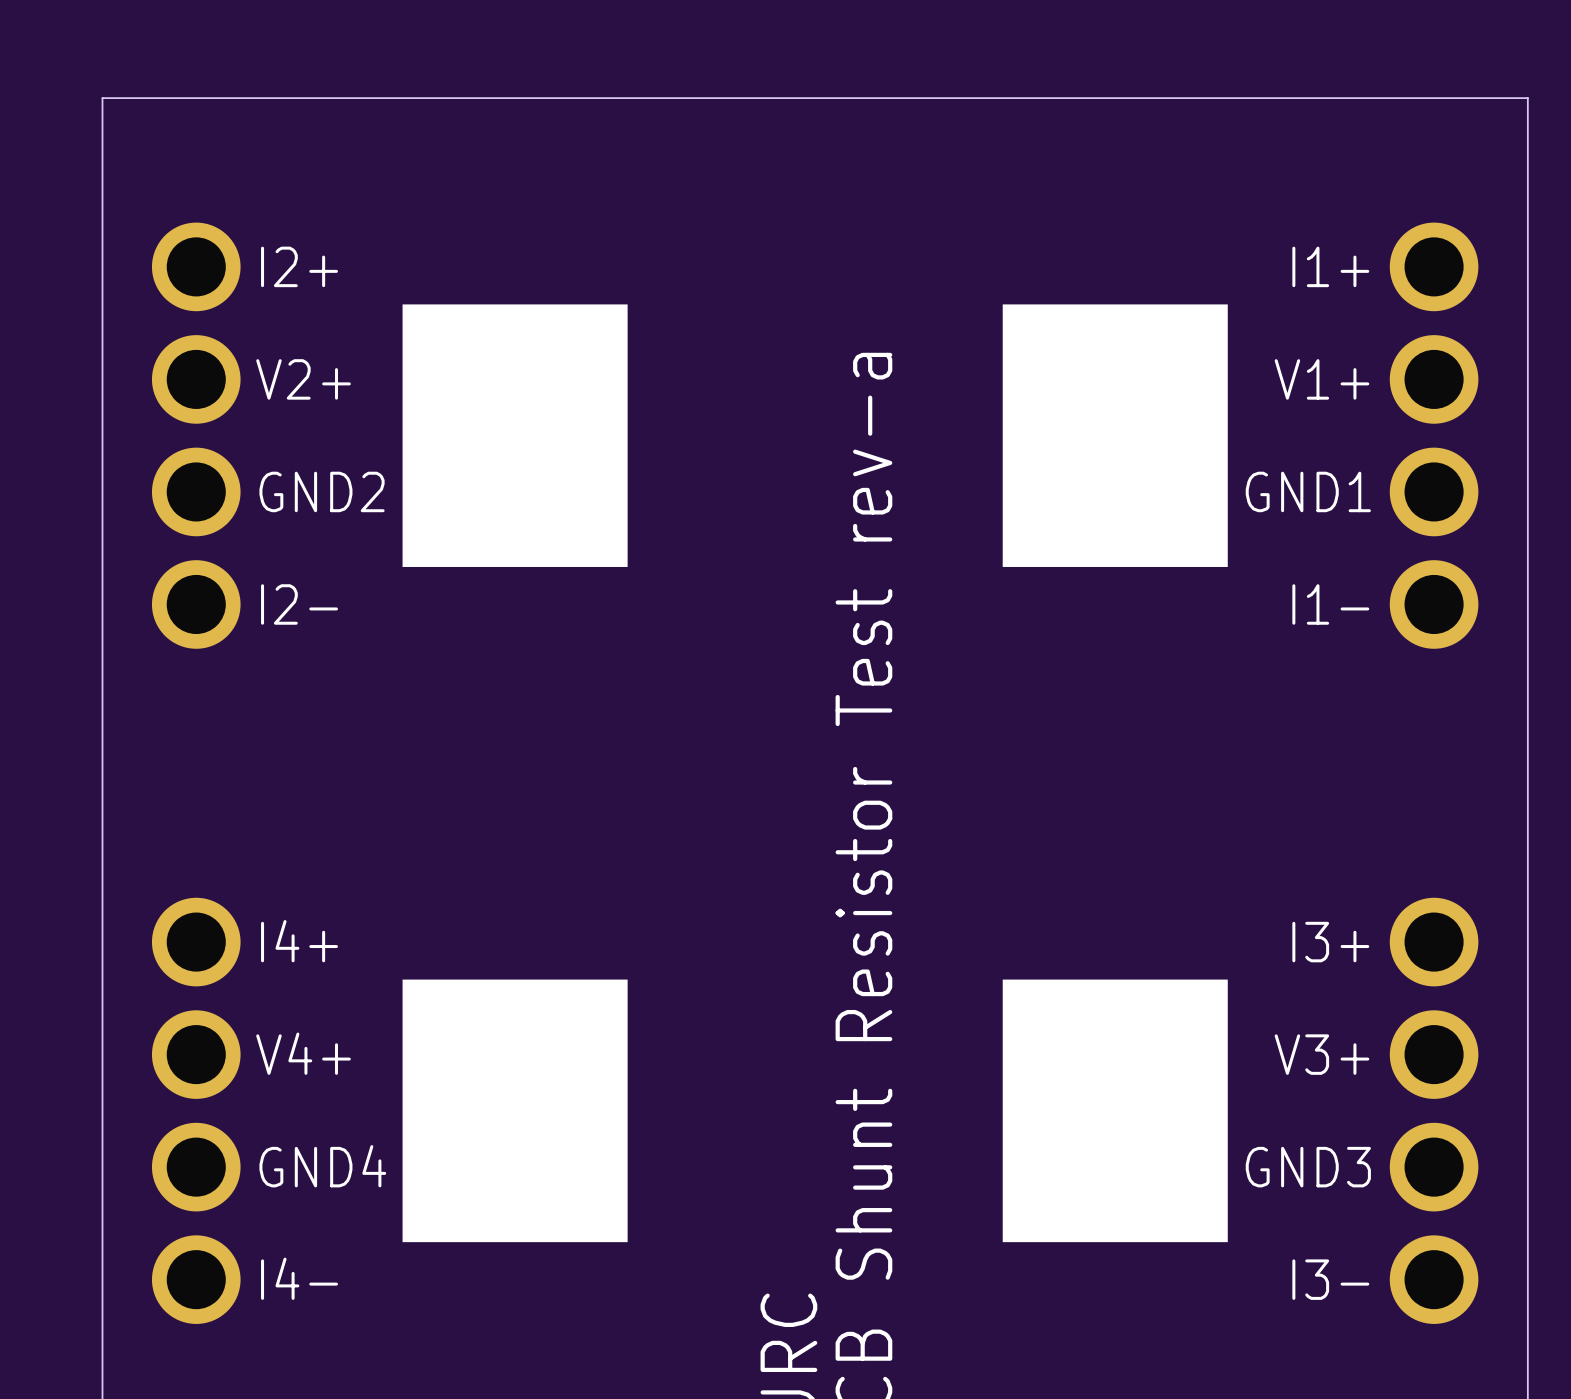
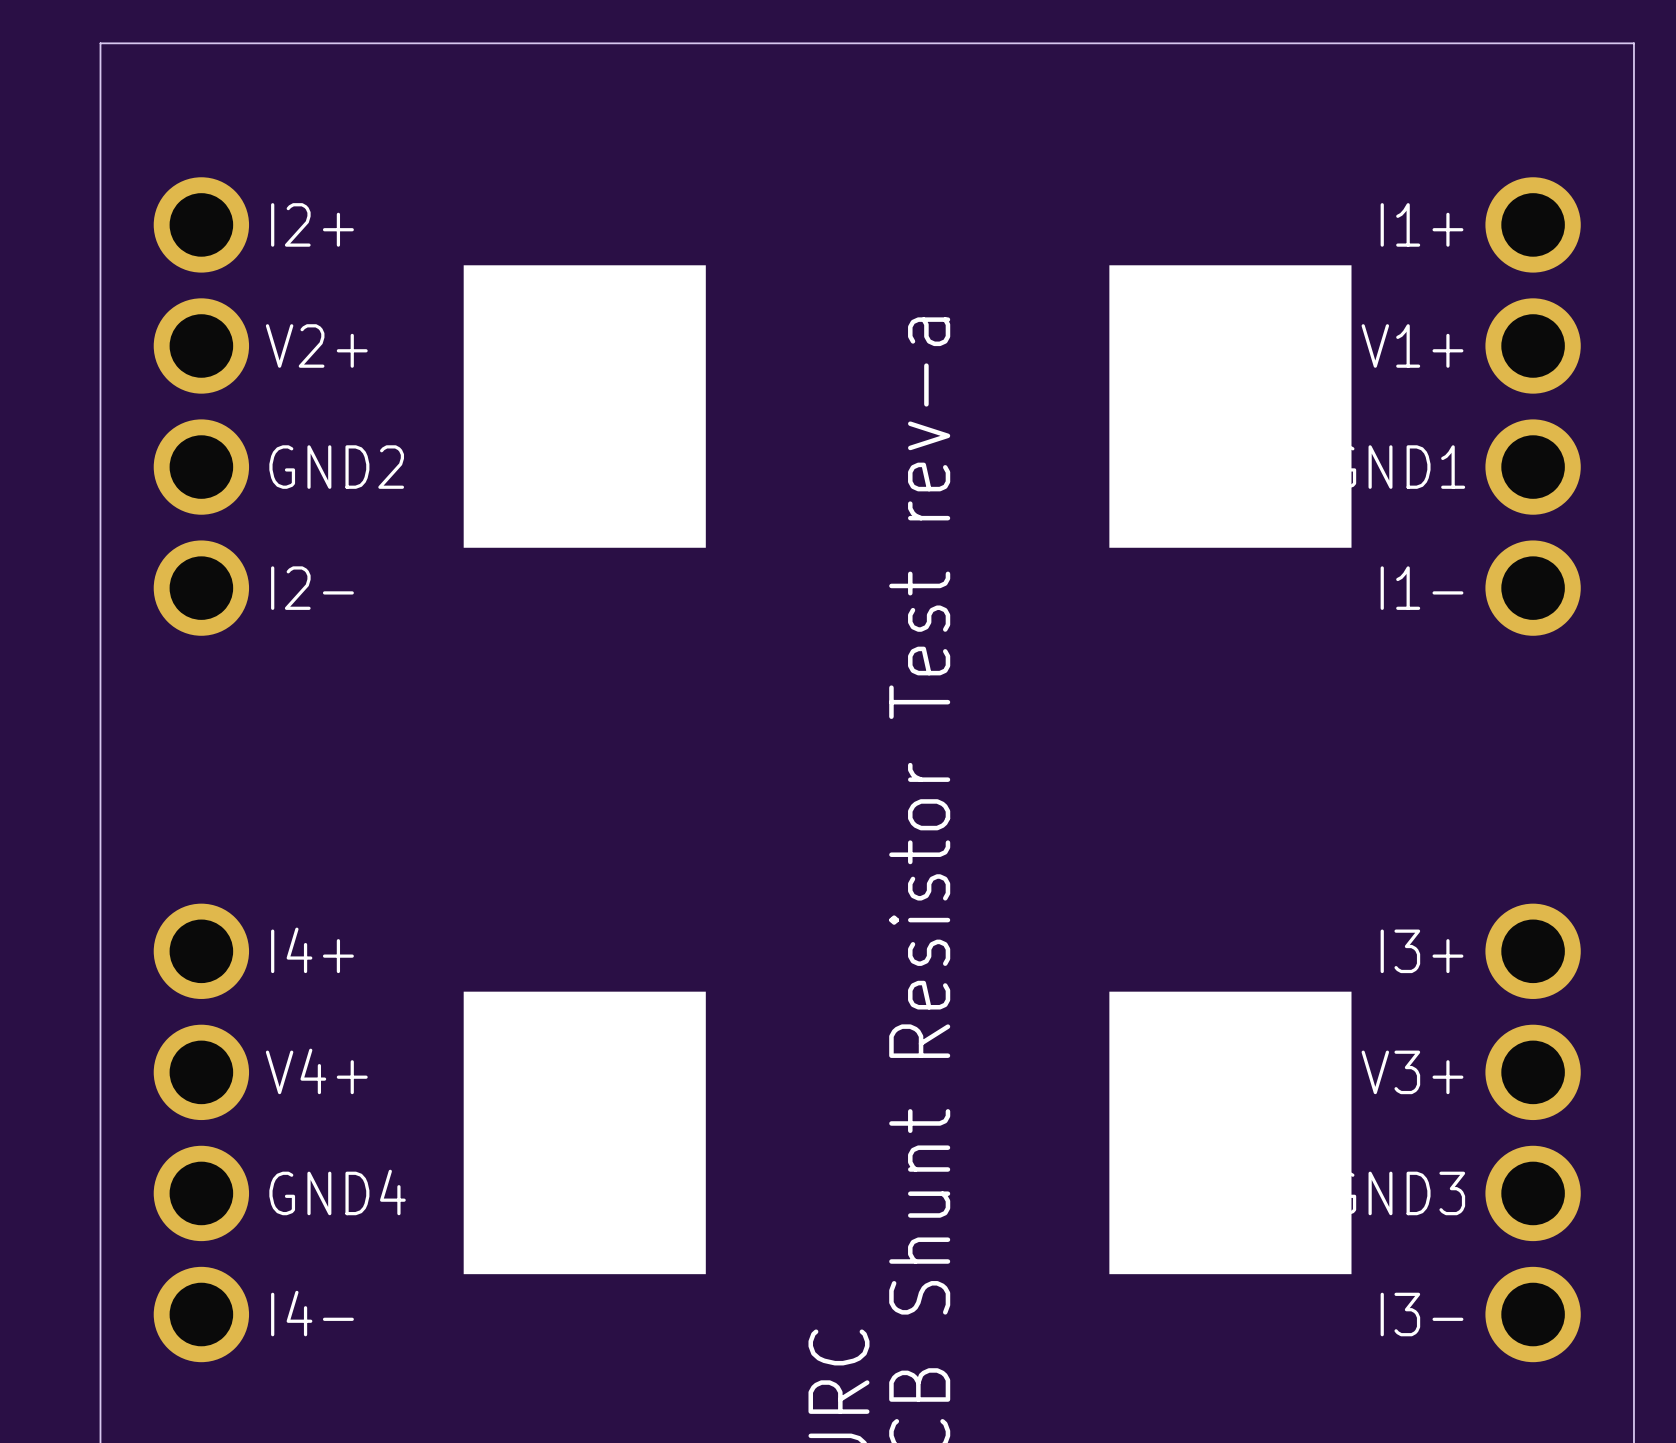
drawing position: (515, 435) -> (584, 406)
drawing position: (1115, 435) -> (1230, 406)
drawing position: (515, 1110) -> (584, 1132)
drawing position: (1115, 1110) -> (1230, 1132)

